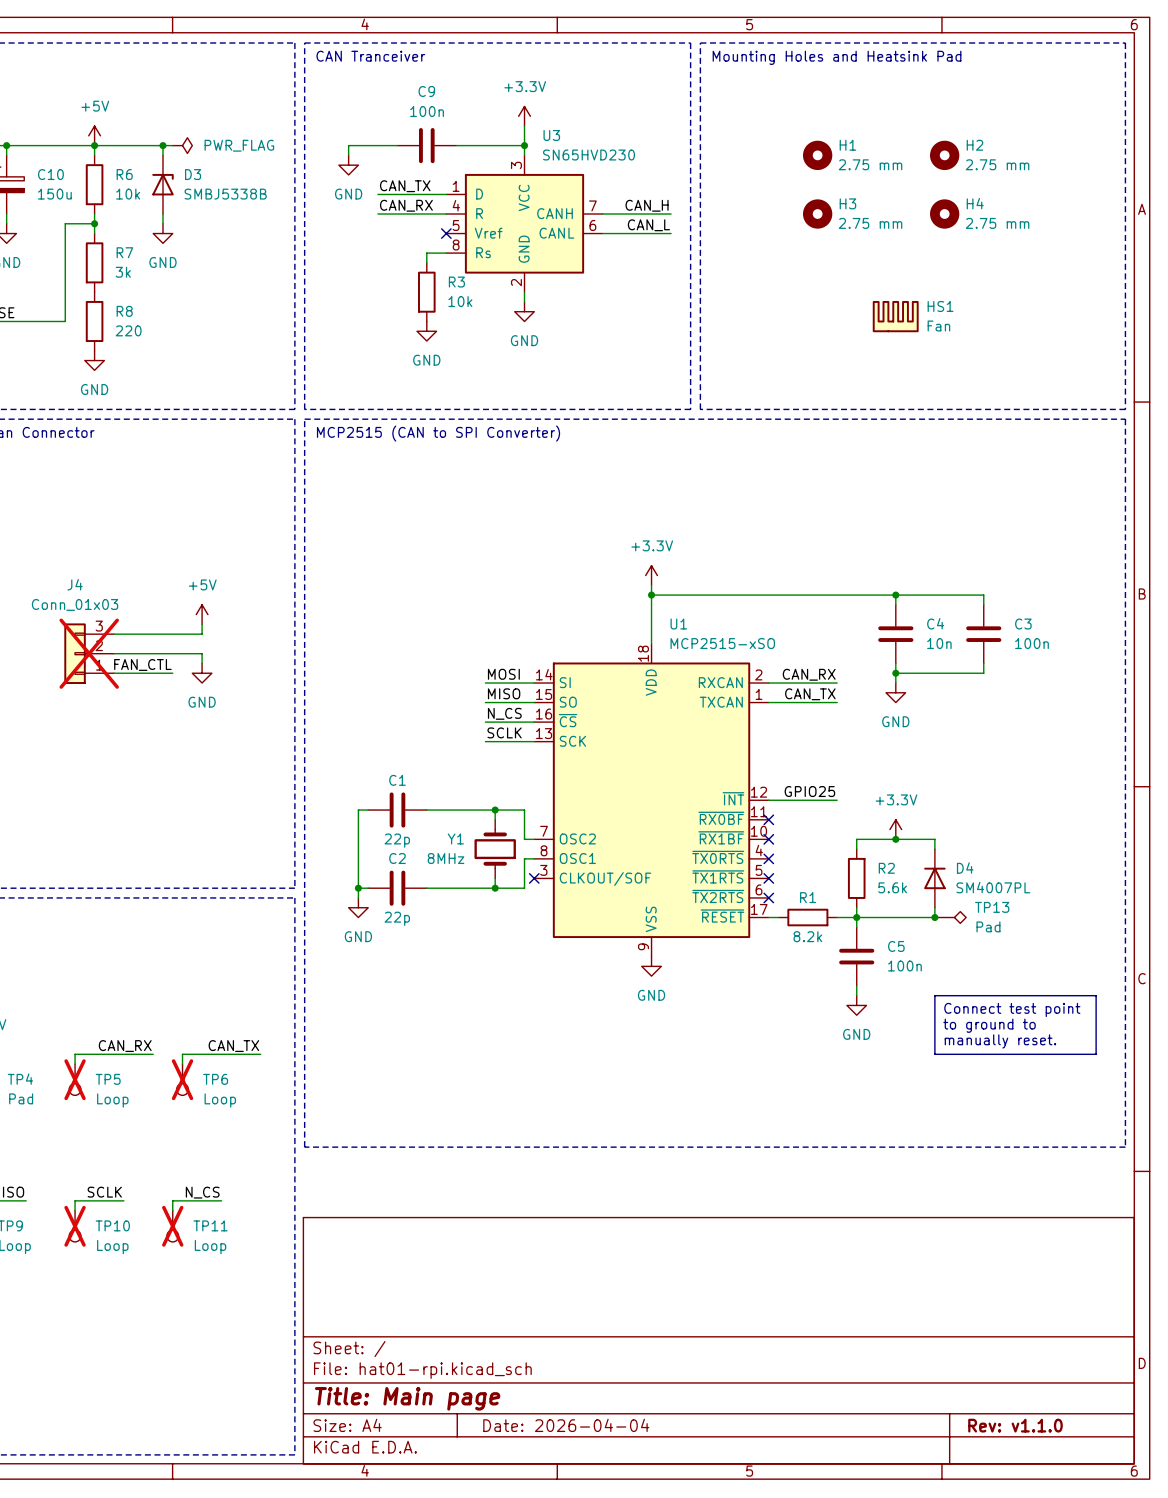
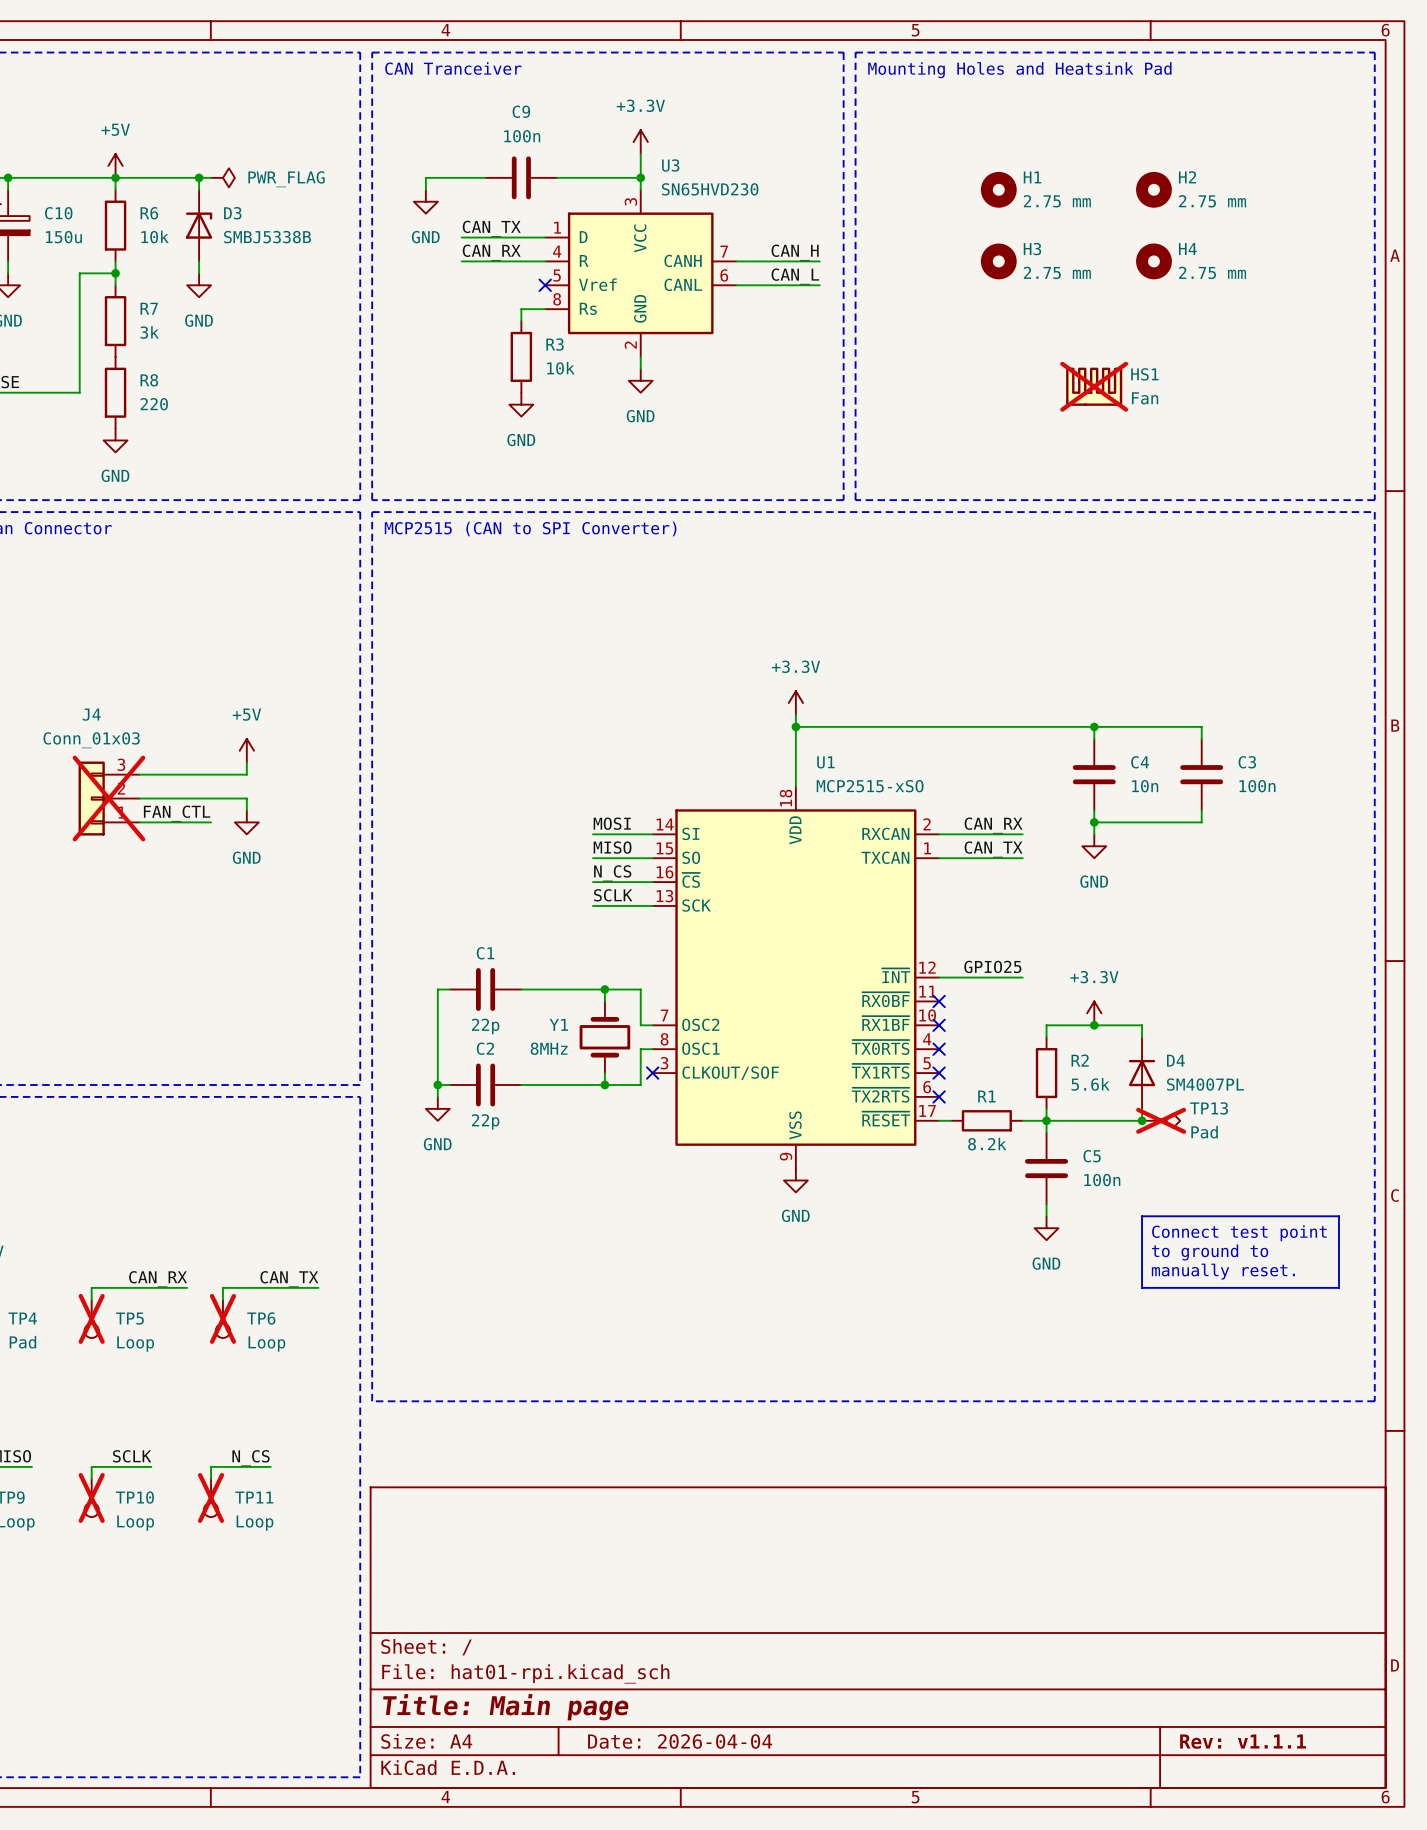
HS1 do-not-place cross: none -> (1094, 386)
TP13 do-not-place cross: none -> (1161, 1120)
title block: Rev: v1.1.0 (1015, 1425) -> Rev: v1.1.1 (1243, 1741)

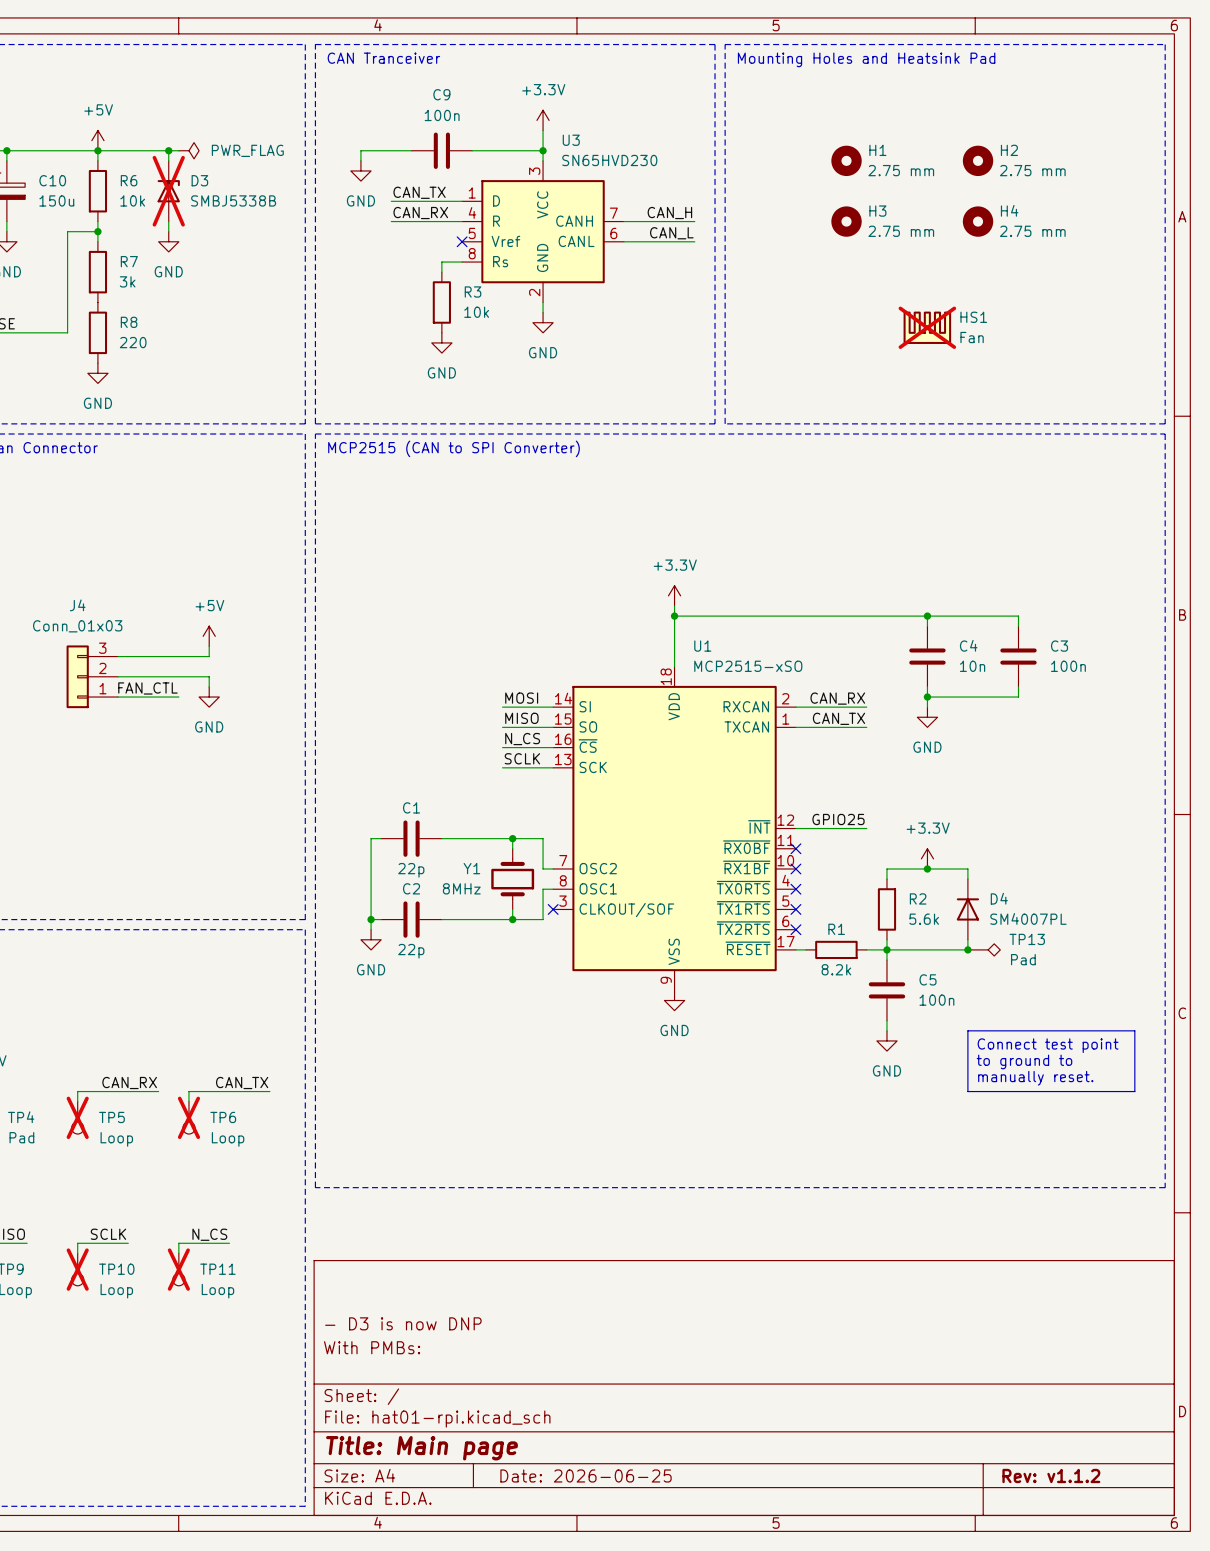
D3 do-not-place cross: none -> (168, 191)
J4 do-not-place cross: (108, 798) -> none
TP13 do-not-place cross: (1161, 1120) -> none
title block: none -> - D3 is now DNP (403, 1323)
title block: none -> With PMBs: (372, 1347)
title block: Date: 2026-04-04 (680, 1741) -> Date: 2026-06-25 (586, 1475)
title block: Rev: v1.1.1 (1243, 1741) -> Rev: v1.1.2 (1051, 1475)

